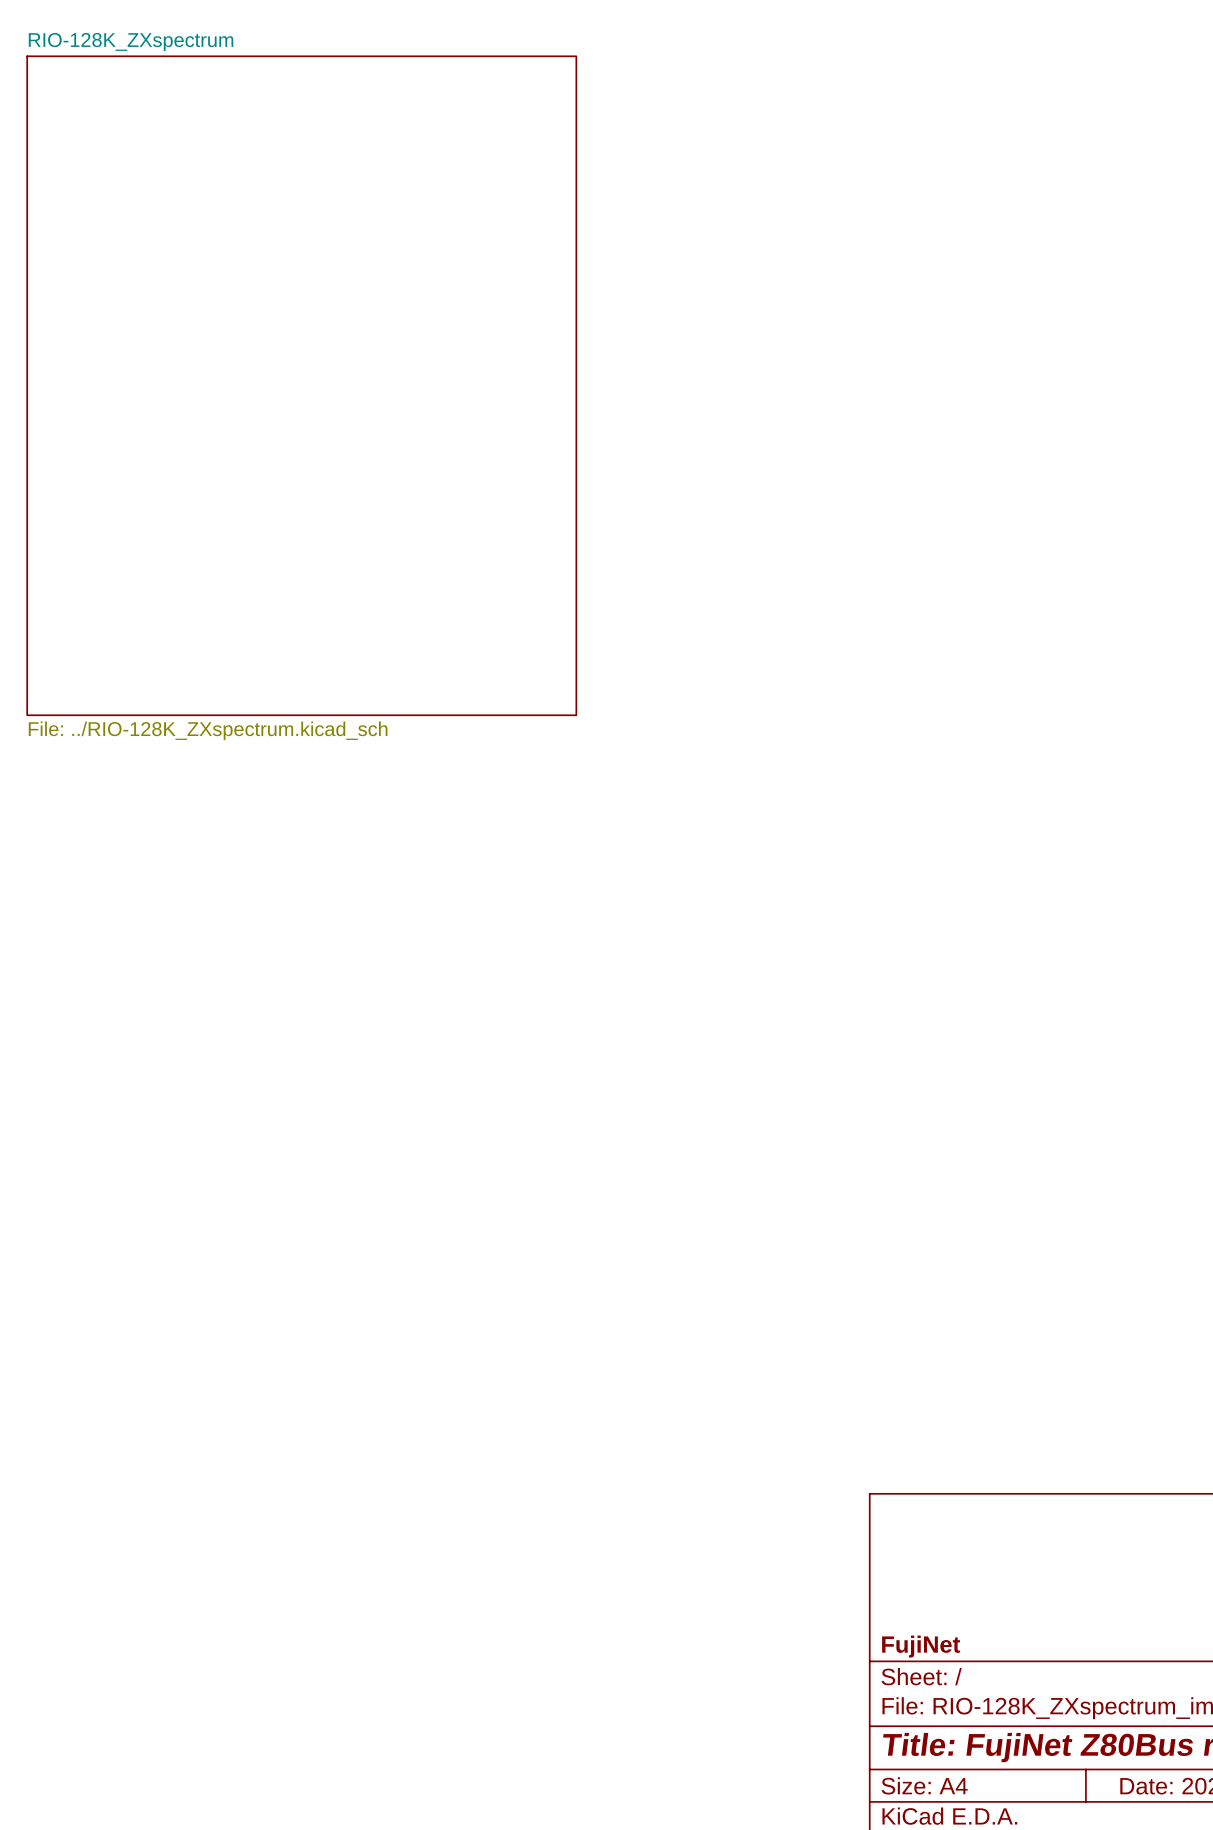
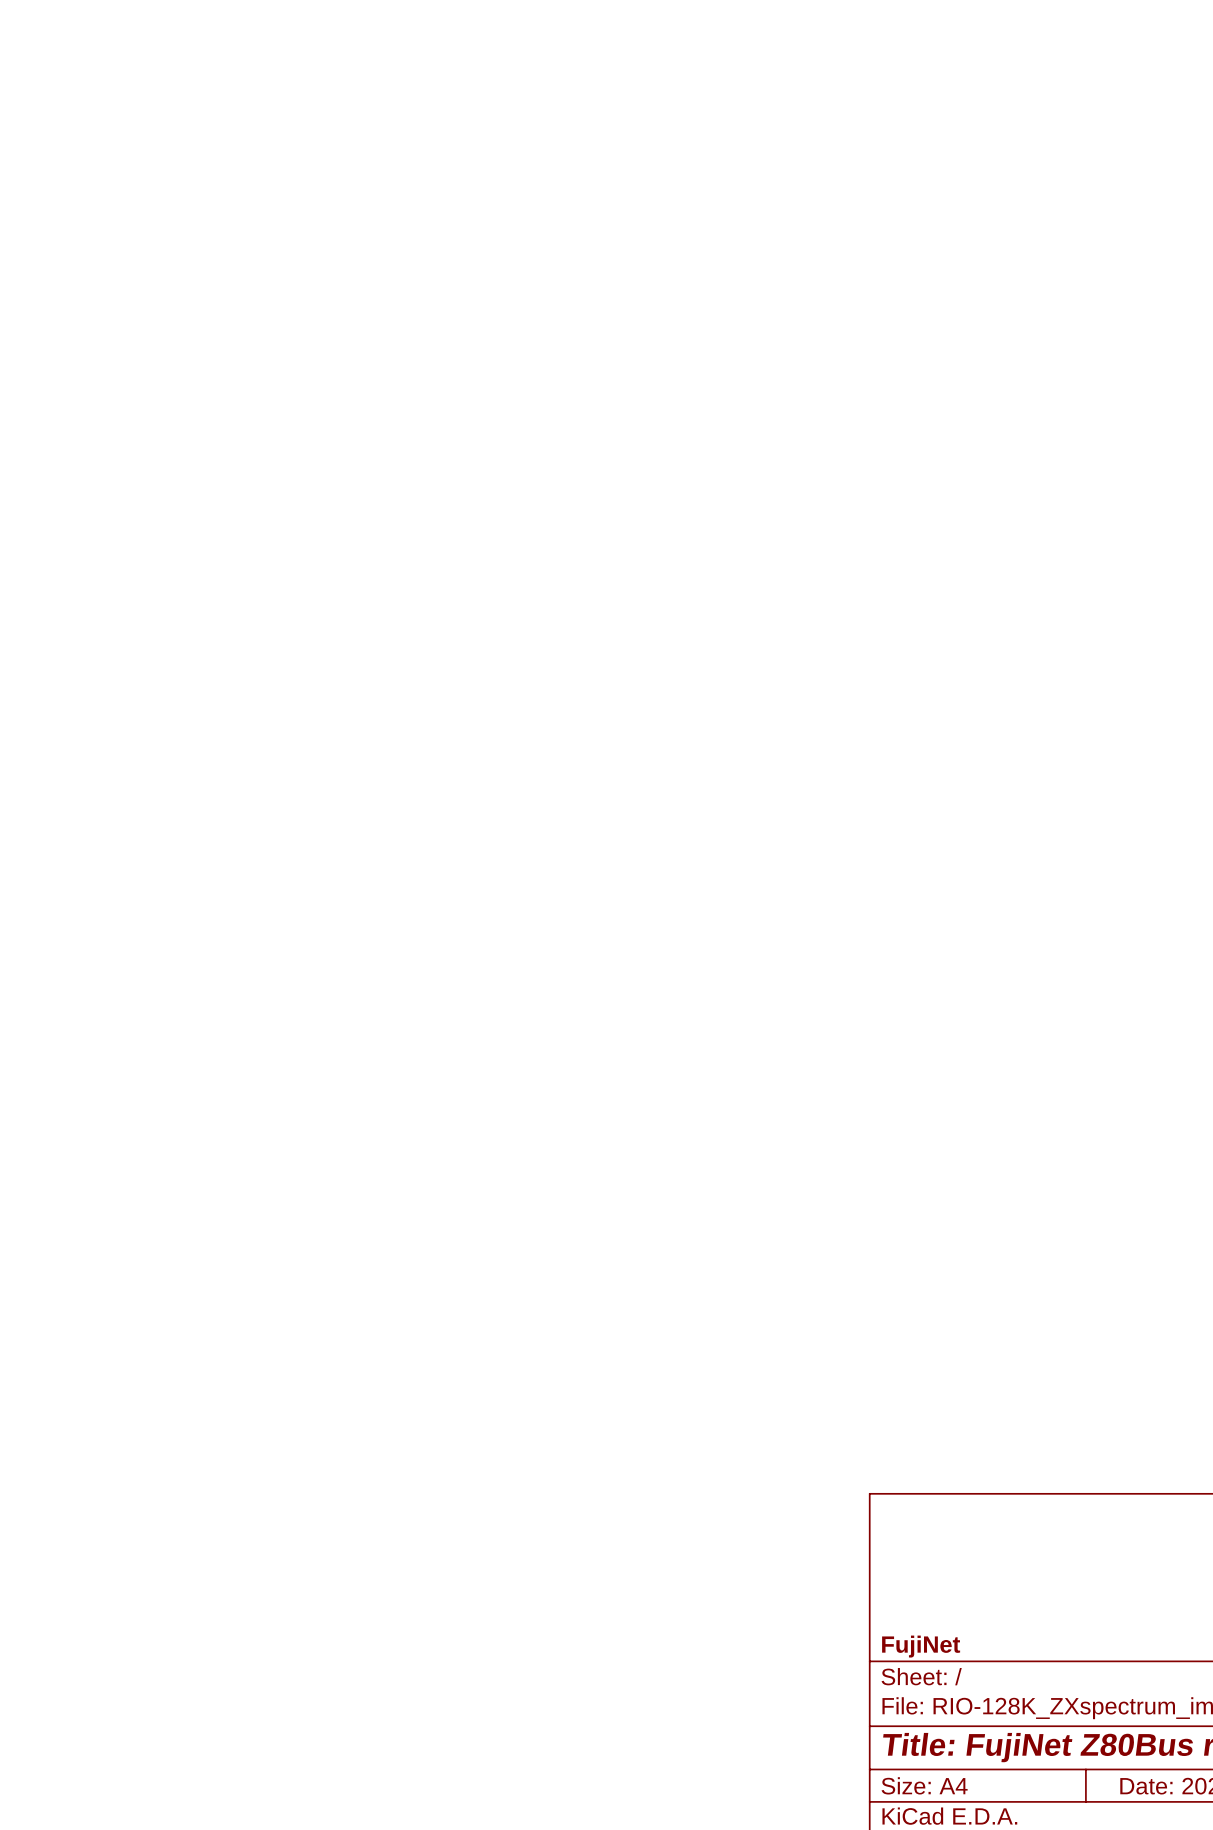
sheet RIO-128K_ZXspectrum: File: ../RIO-128K_ZXspectrum.kicad_sch (301, 385) -> none

